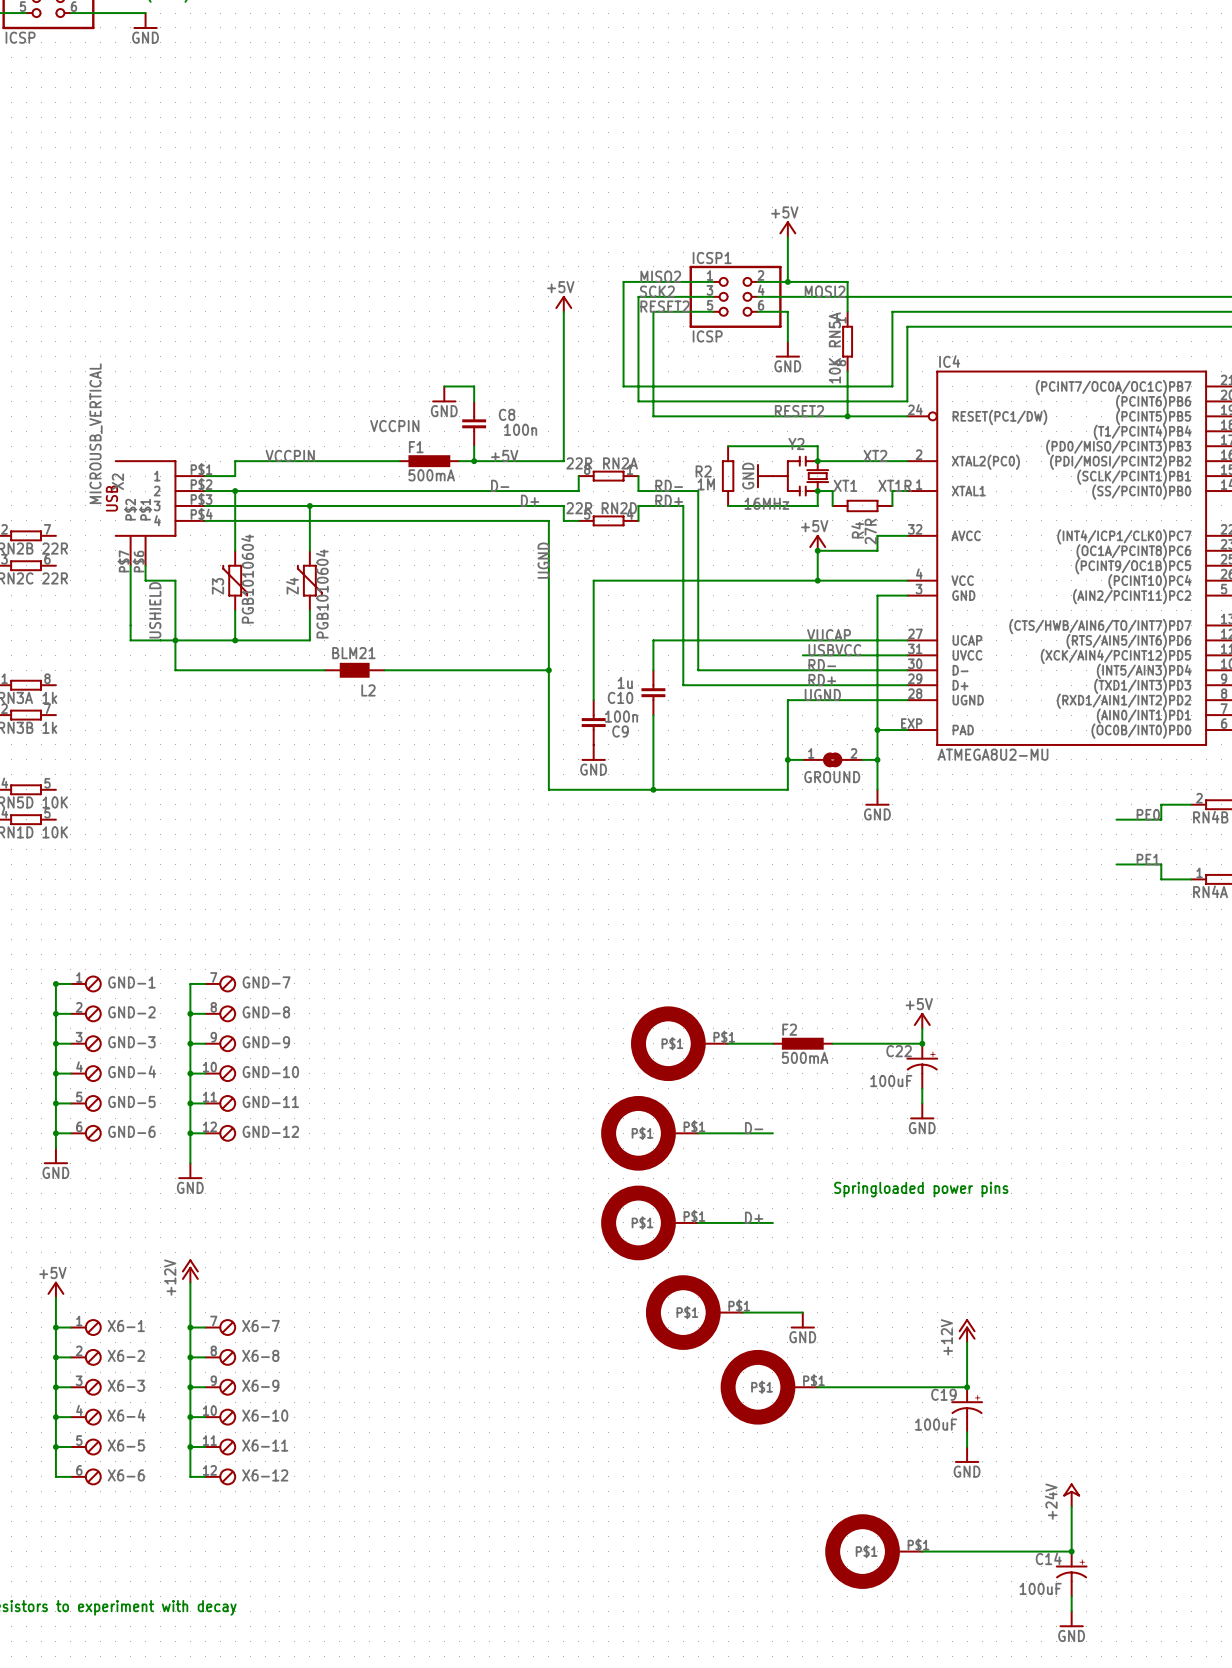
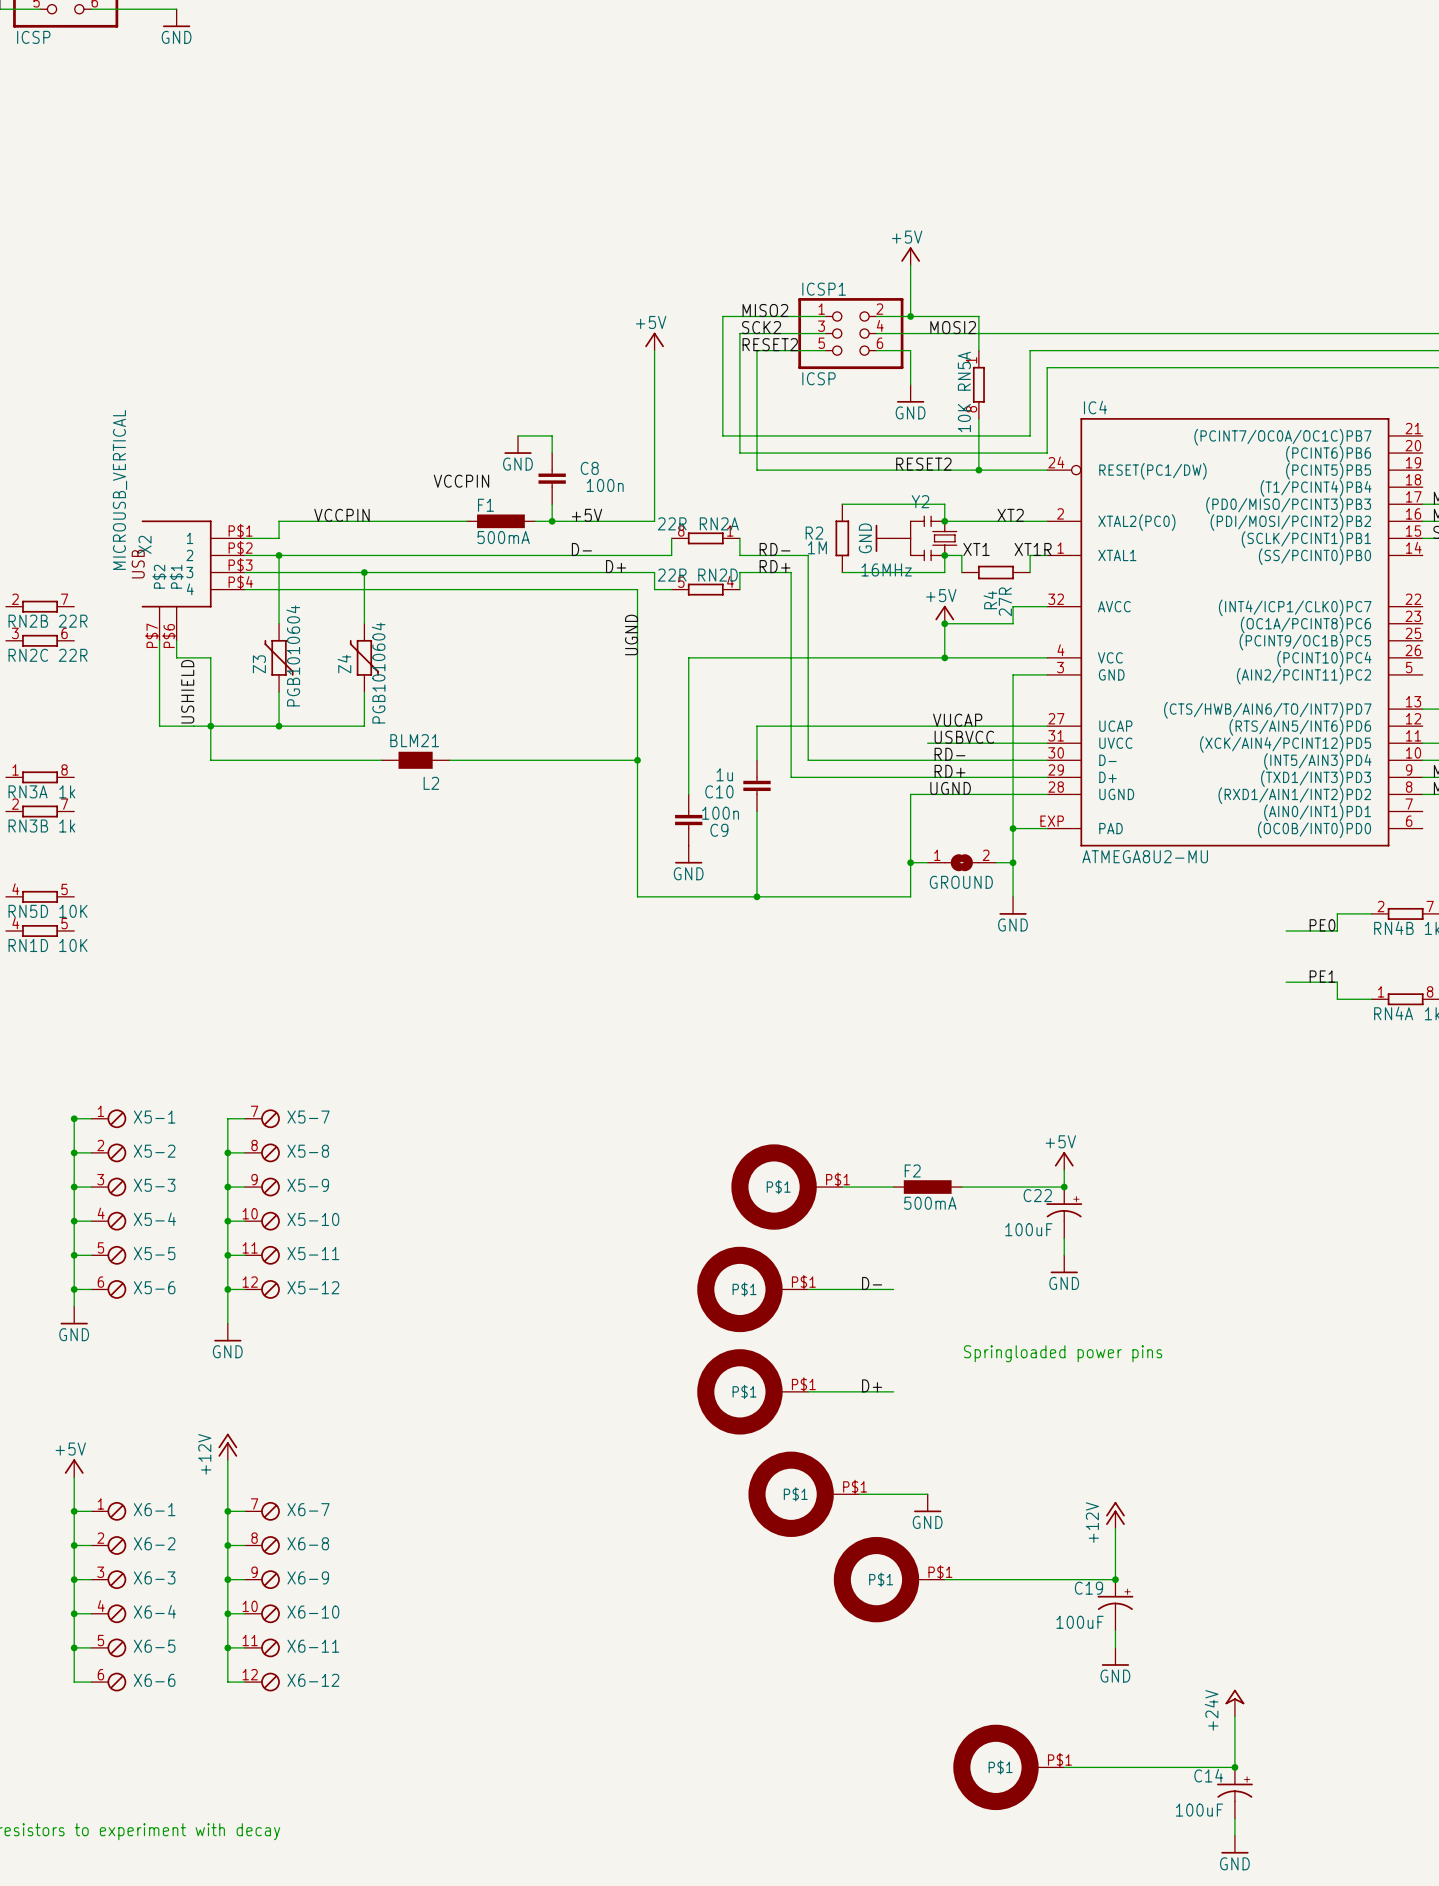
GND-1 name: GND-1 (131, 982) -> X5-1 (154, 1117)
GND-7 name: GND-7 (266, 982) -> X5-7 (308, 1117)
GND-2 name: GND-2 (131, 1012) -> X5-2 (154, 1151)
GND-8 name: GND-8 (266, 1012) -> X5-8 (308, 1151)
GND-3 name: GND-3 (131, 1042) -> X5-3 (154, 1185)
GND-9 name: GND-9 (266, 1042) -> X5-9 (308, 1185)
GND-4 name: GND-4 (132, 1071) -> X5-4 (154, 1219)
GND-10 name: GND-10 (270, 1072) -> X5-10 (313, 1219)
GND-5 name: GND-5 (131, 1101) -> X5-5 (154, 1253)
GND-11 name: GND-11 (270, 1101) -> X5-11 (313, 1253)
GND-6 name: GND-6 (131, 1131) -> X5-6 (154, 1287)
GND-12 name: GND-12 (270, 1131) -> X5-12 (313, 1287)

